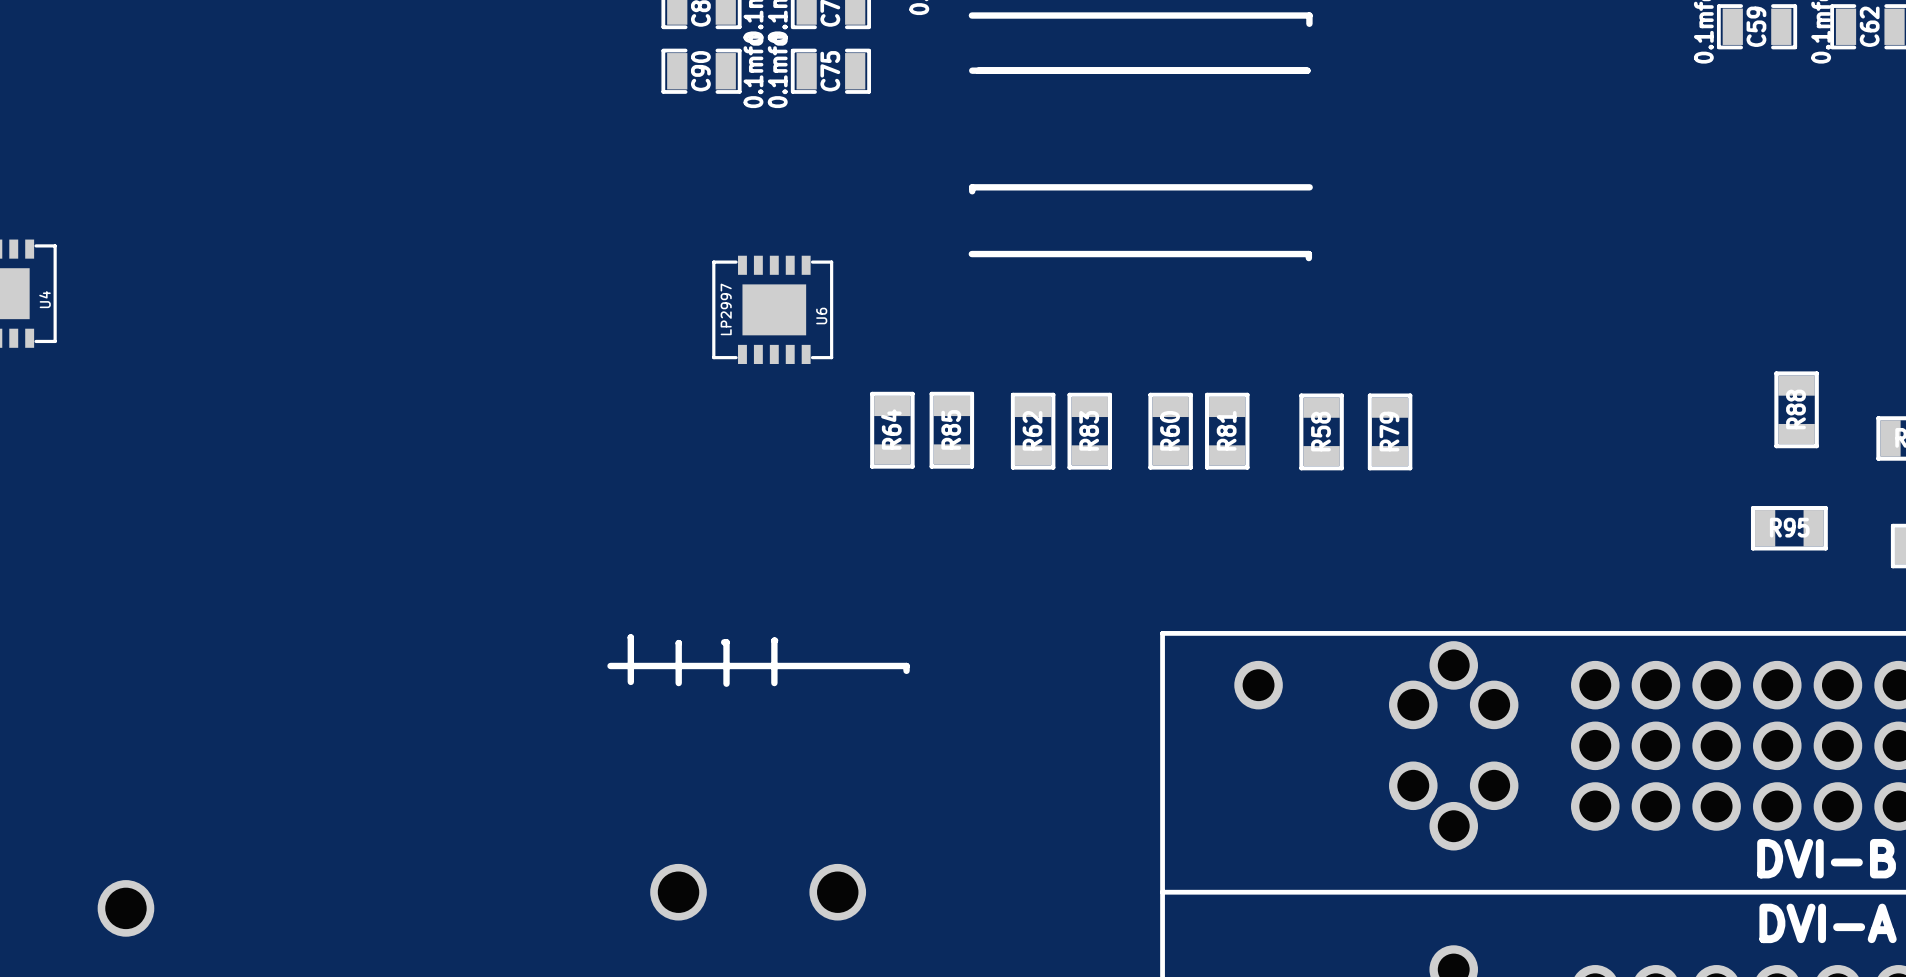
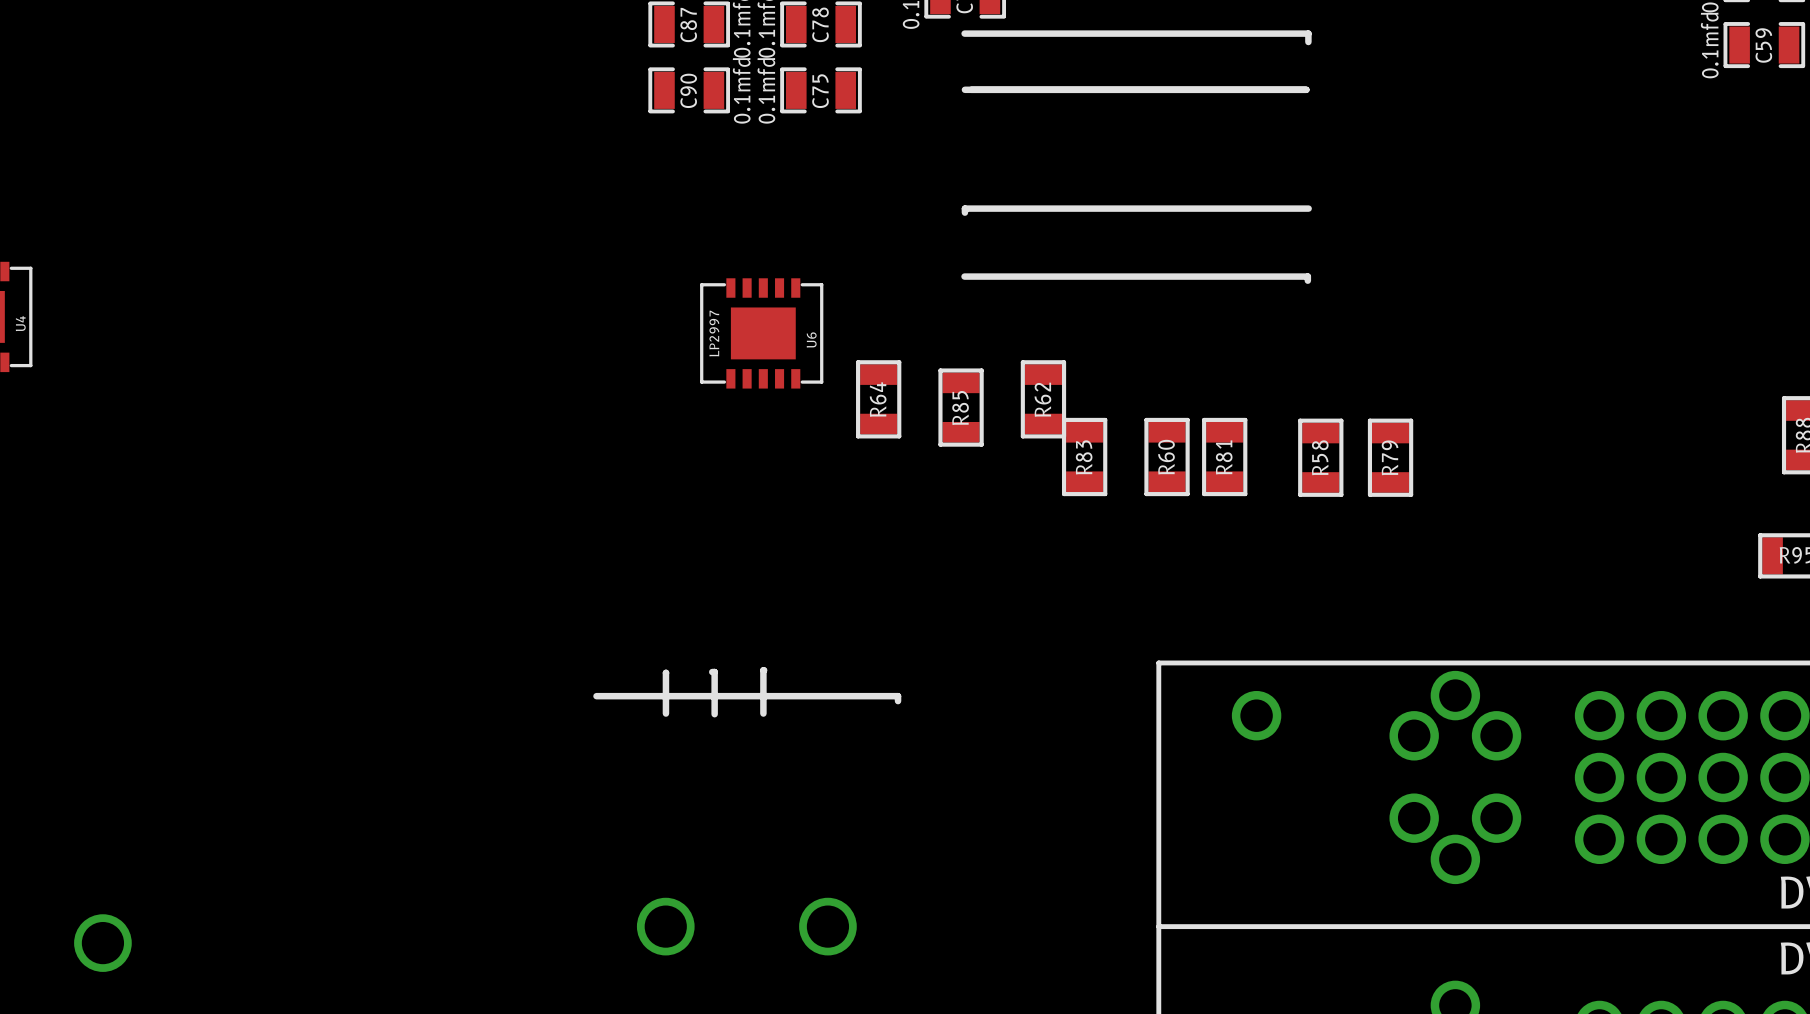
R64 position: (892, 430) -> (878, 399)
R85 position: (951, 430) -> (961, 407)
R62 position: (1033, 431) -> (1043, 399)
line: (630, 637) (630, 681) -> none

